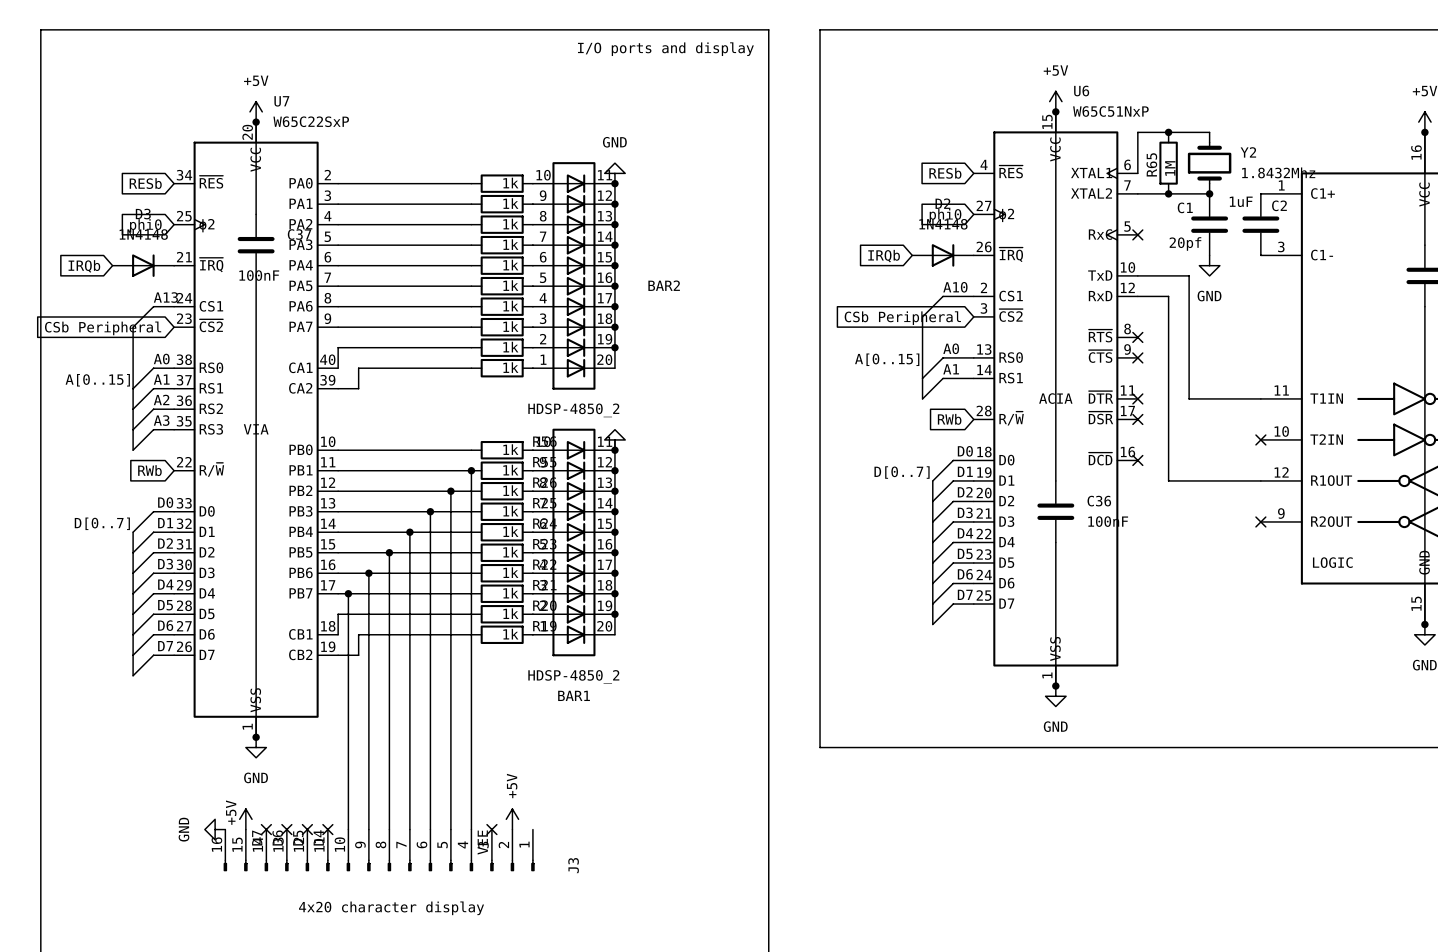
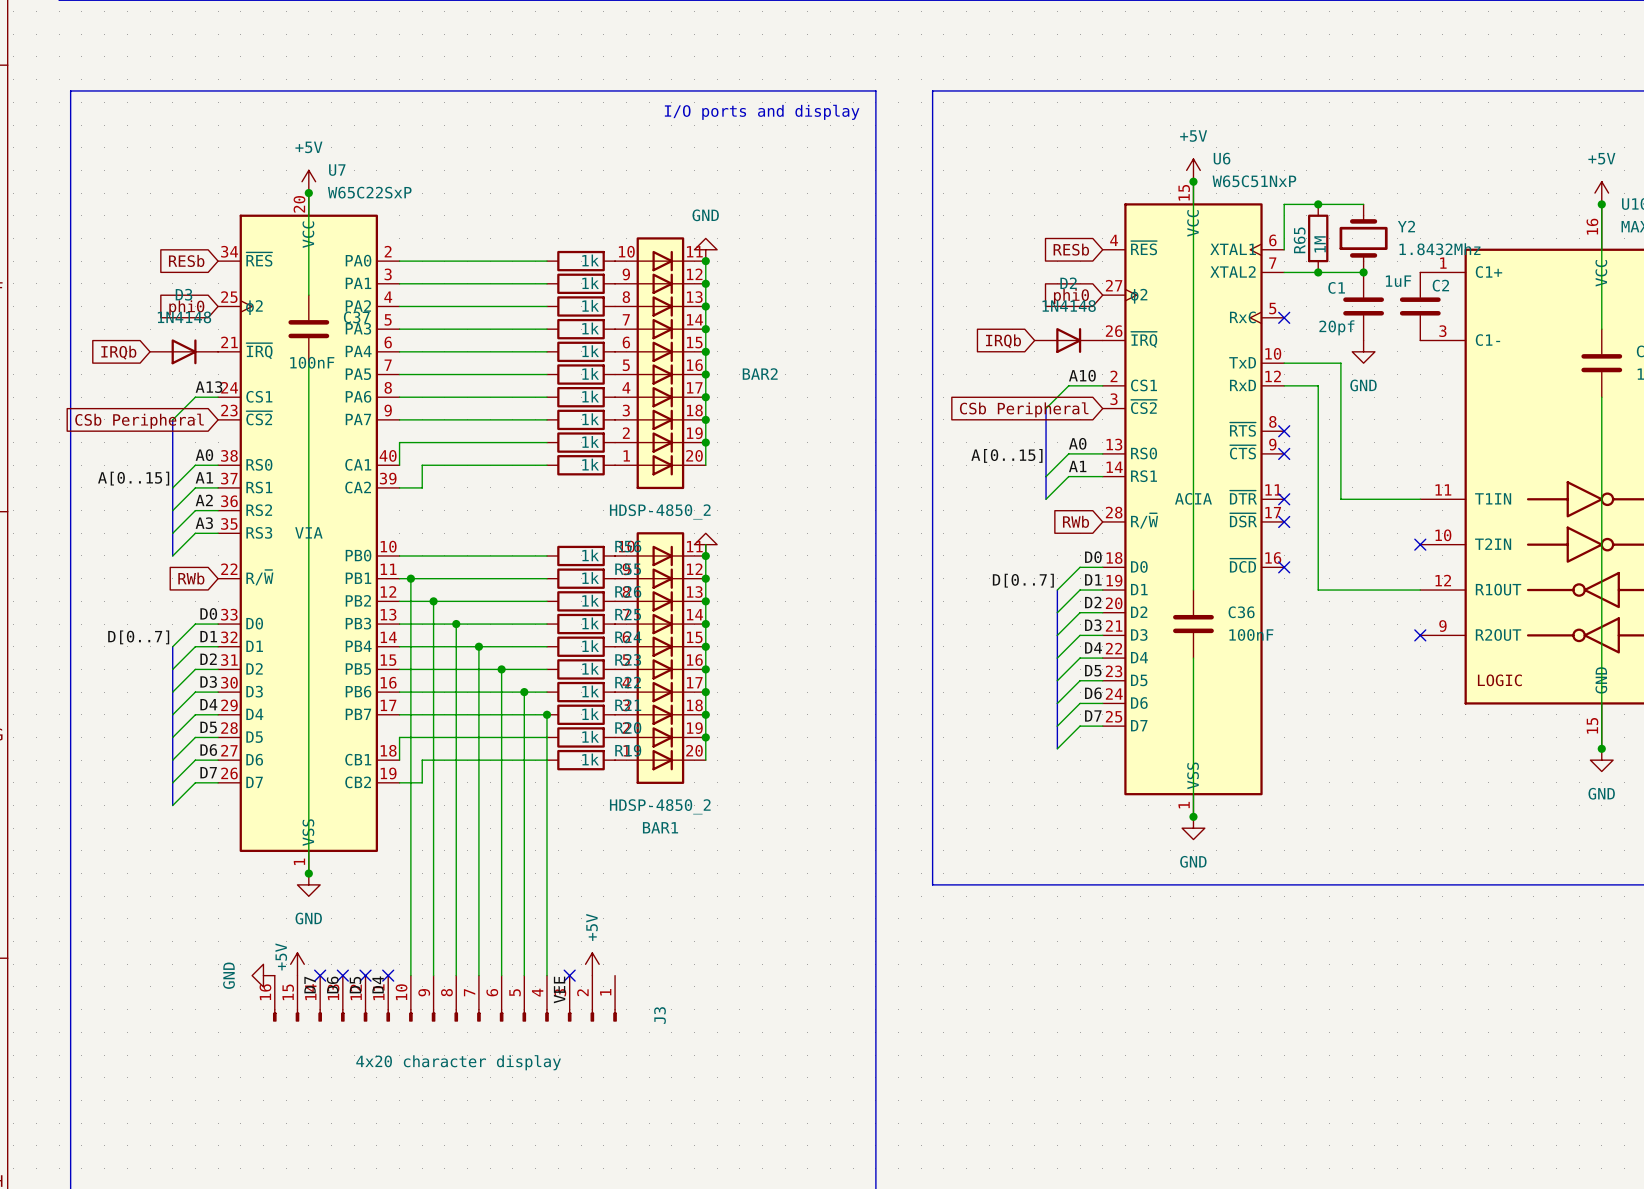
junction: none -> (410, 578)
wire: (471, 470) (471, 593) -> (410, 578) (410, 714)
junction: (471, 470) -> none
junction: none -> (433, 601)
wire: (450, 491) (450, 573) -> (433, 601) (433, 692)
junction: (450, 491) -> none
junction: none -> (456, 624)
wire: (430, 511) (430, 552) -> (456, 624) (456, 669)
junction: (430, 511) -> none
junction: (389, 552) -> none
junction: none -> (501, 669)
junction: (368, 573) -> none
junction: none -> (524, 692)
junction: (348, 593) -> none
junction: none -> (546, 714)

